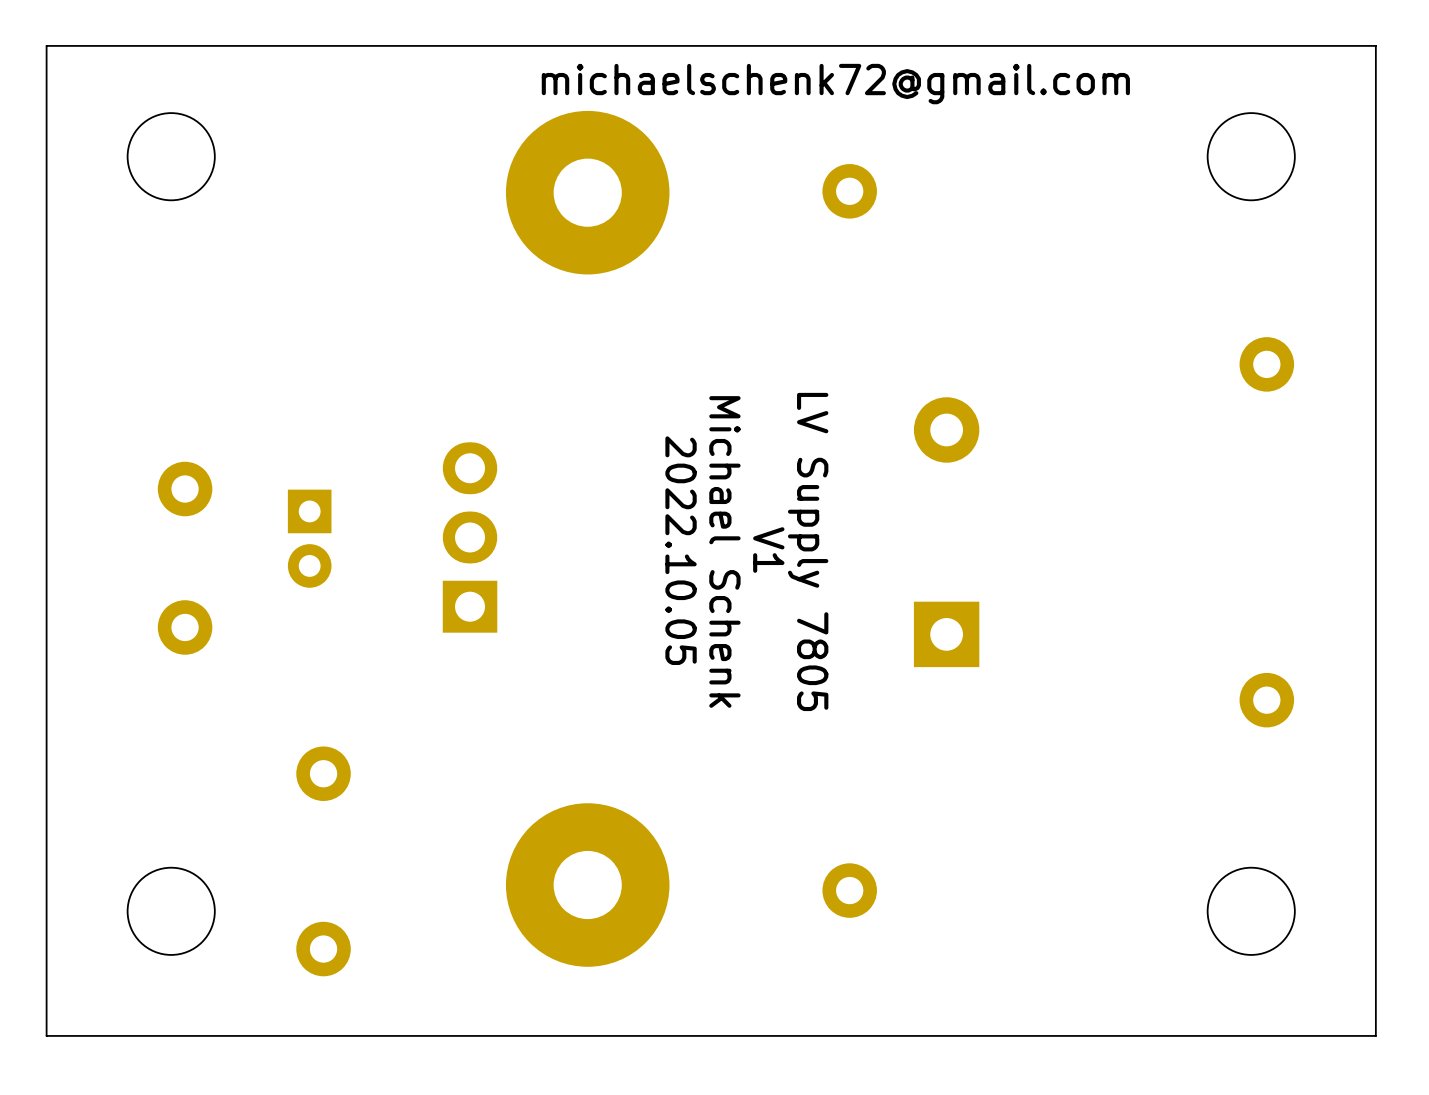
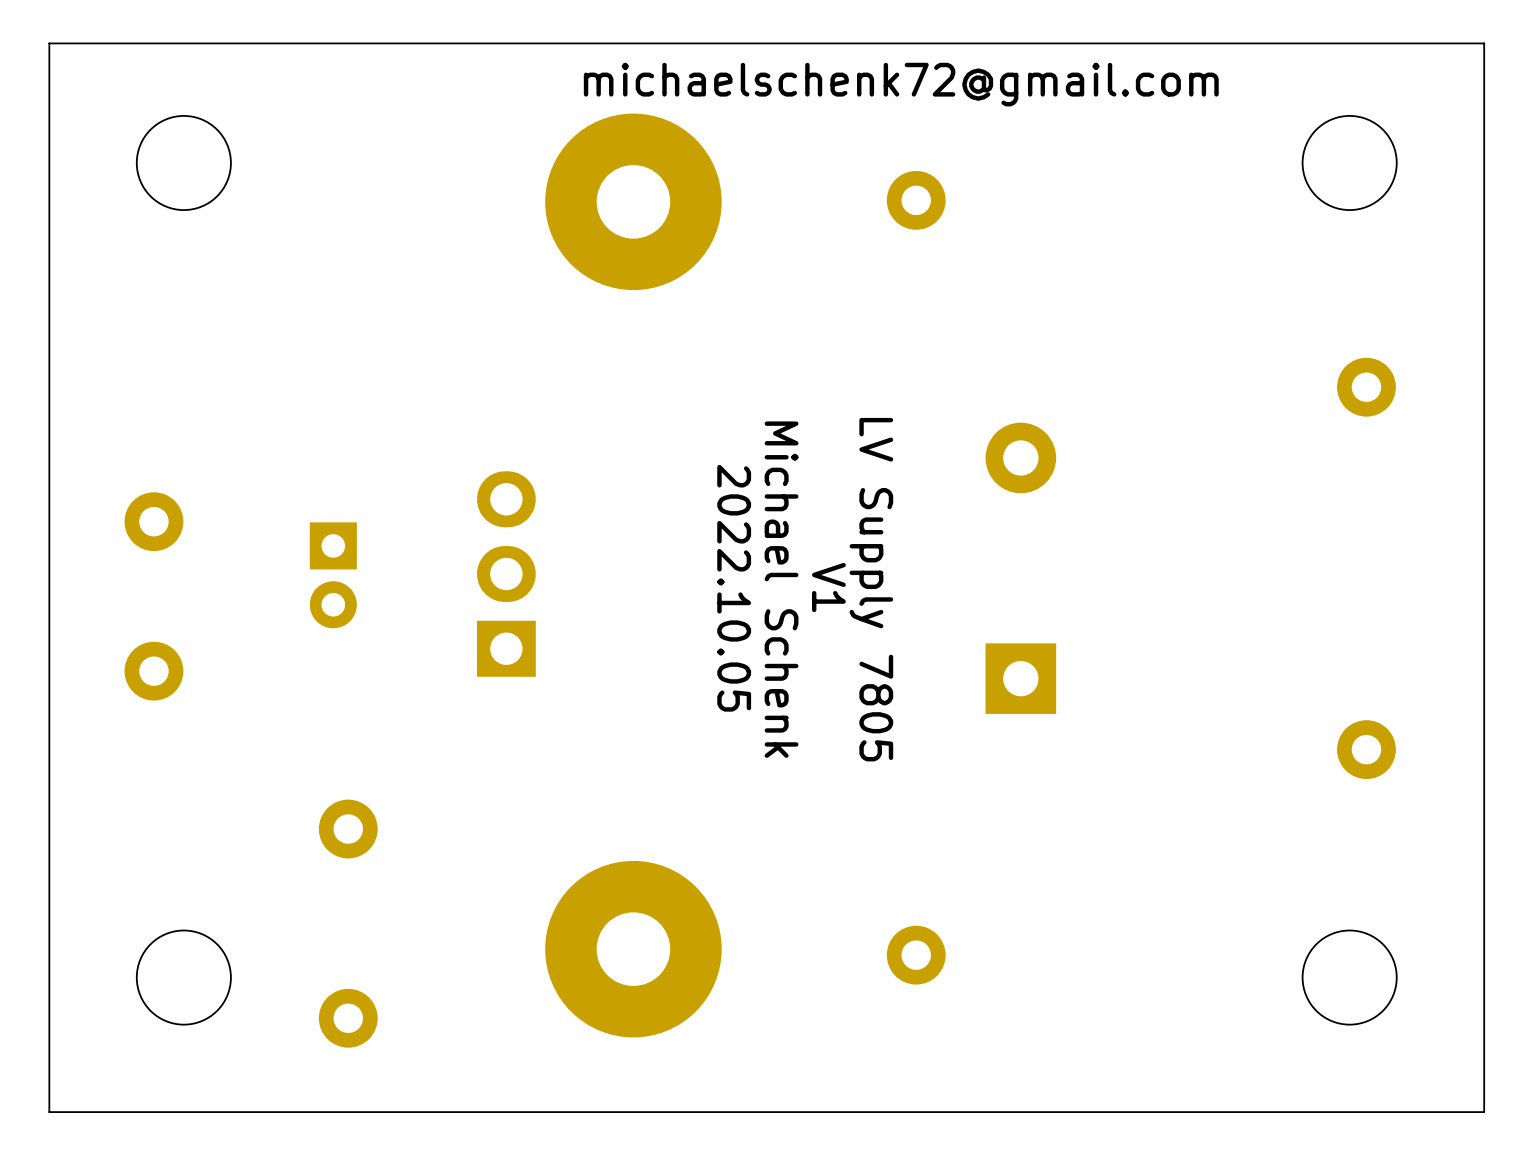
part position: (185, 489) -> (153, 521)
part position: (185, 627) -> (153, 671)

